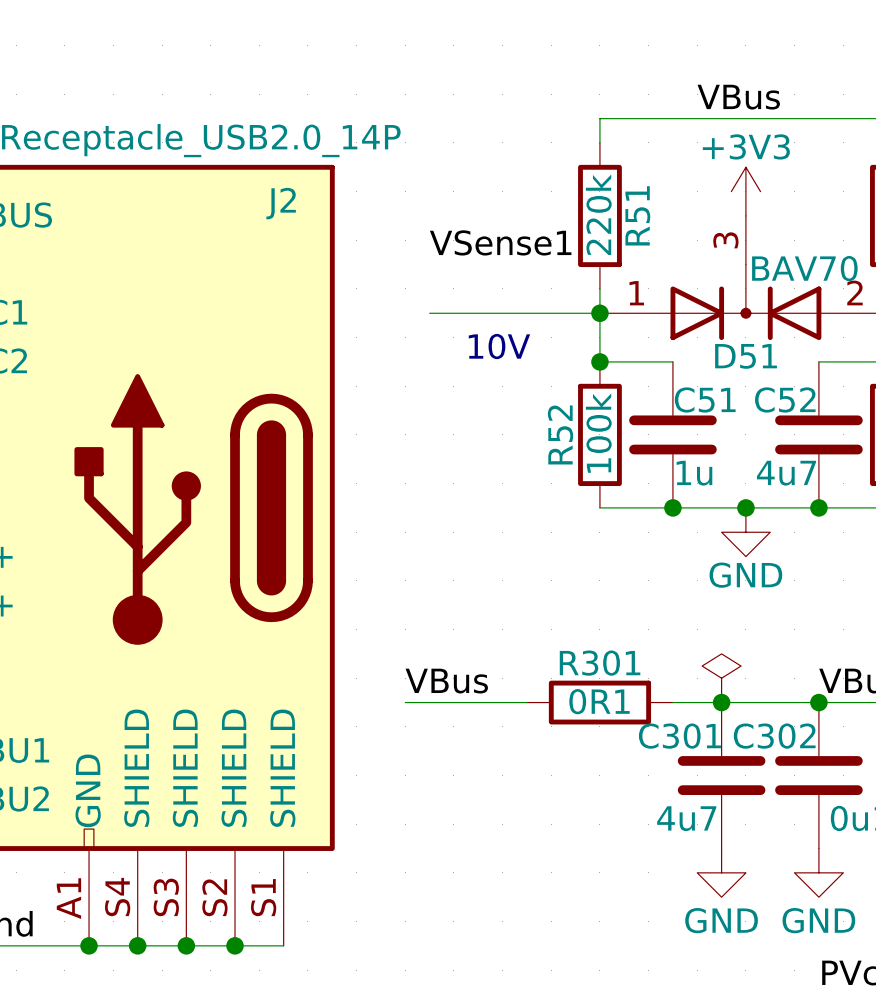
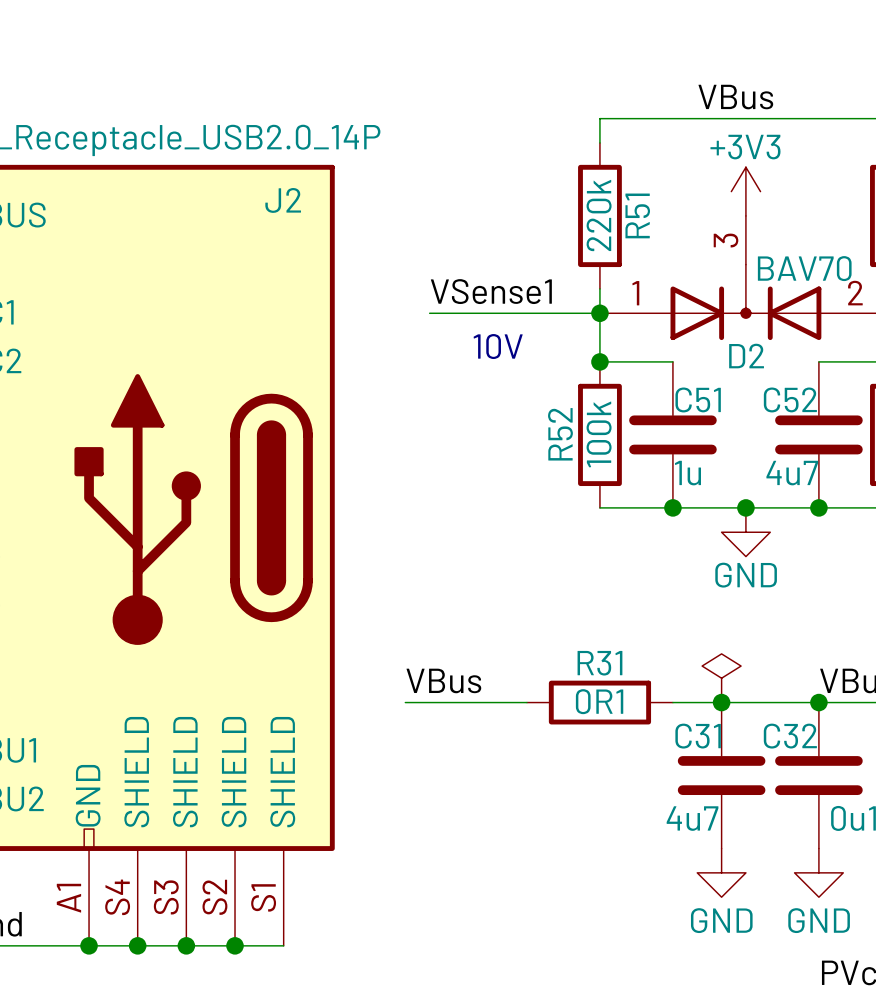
label position: VSense1 (500, 242) -> VSense1 (491, 291)
D51 name: D51 (746, 356) -> D2 (746, 356)
R301 name: R301 (600, 663) -> R31 (599, 663)
C301 name: C301 (679, 736) -> C31 (698, 736)
C302 name: C302 (774, 736) -> C32 (790, 736)

